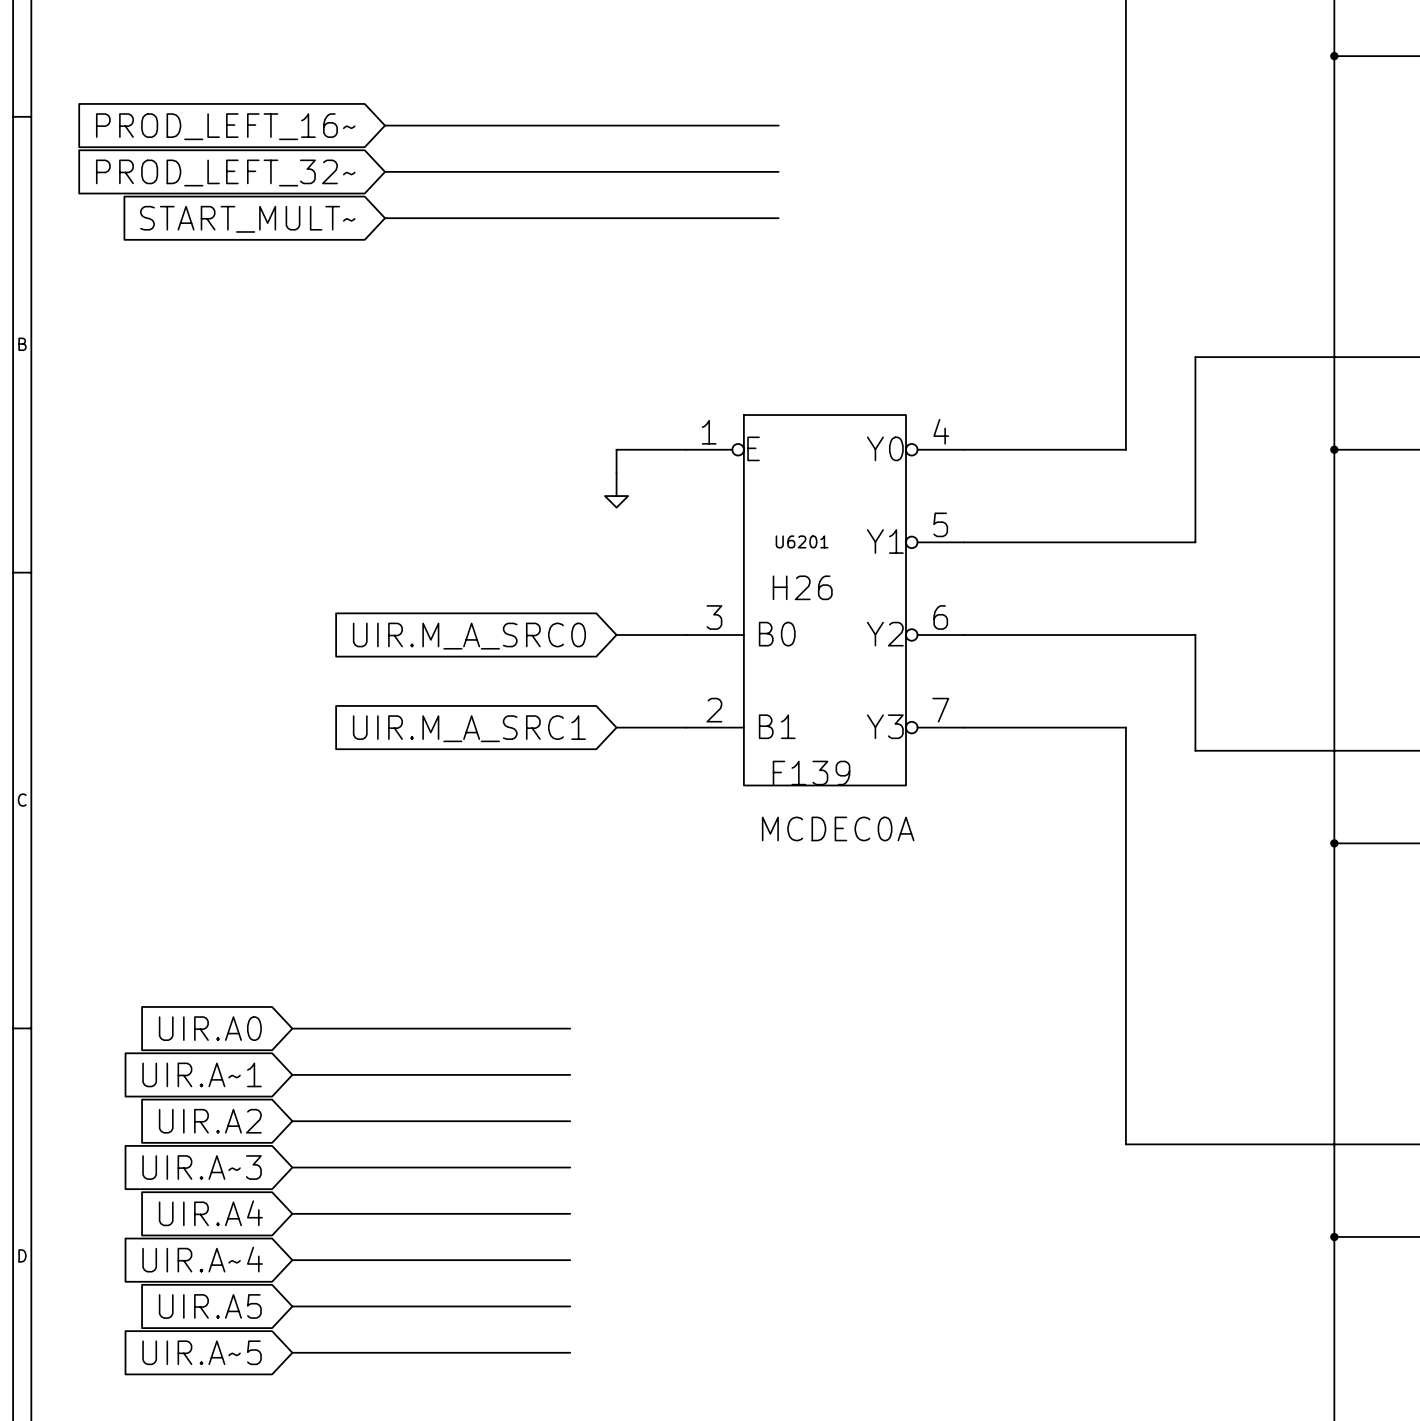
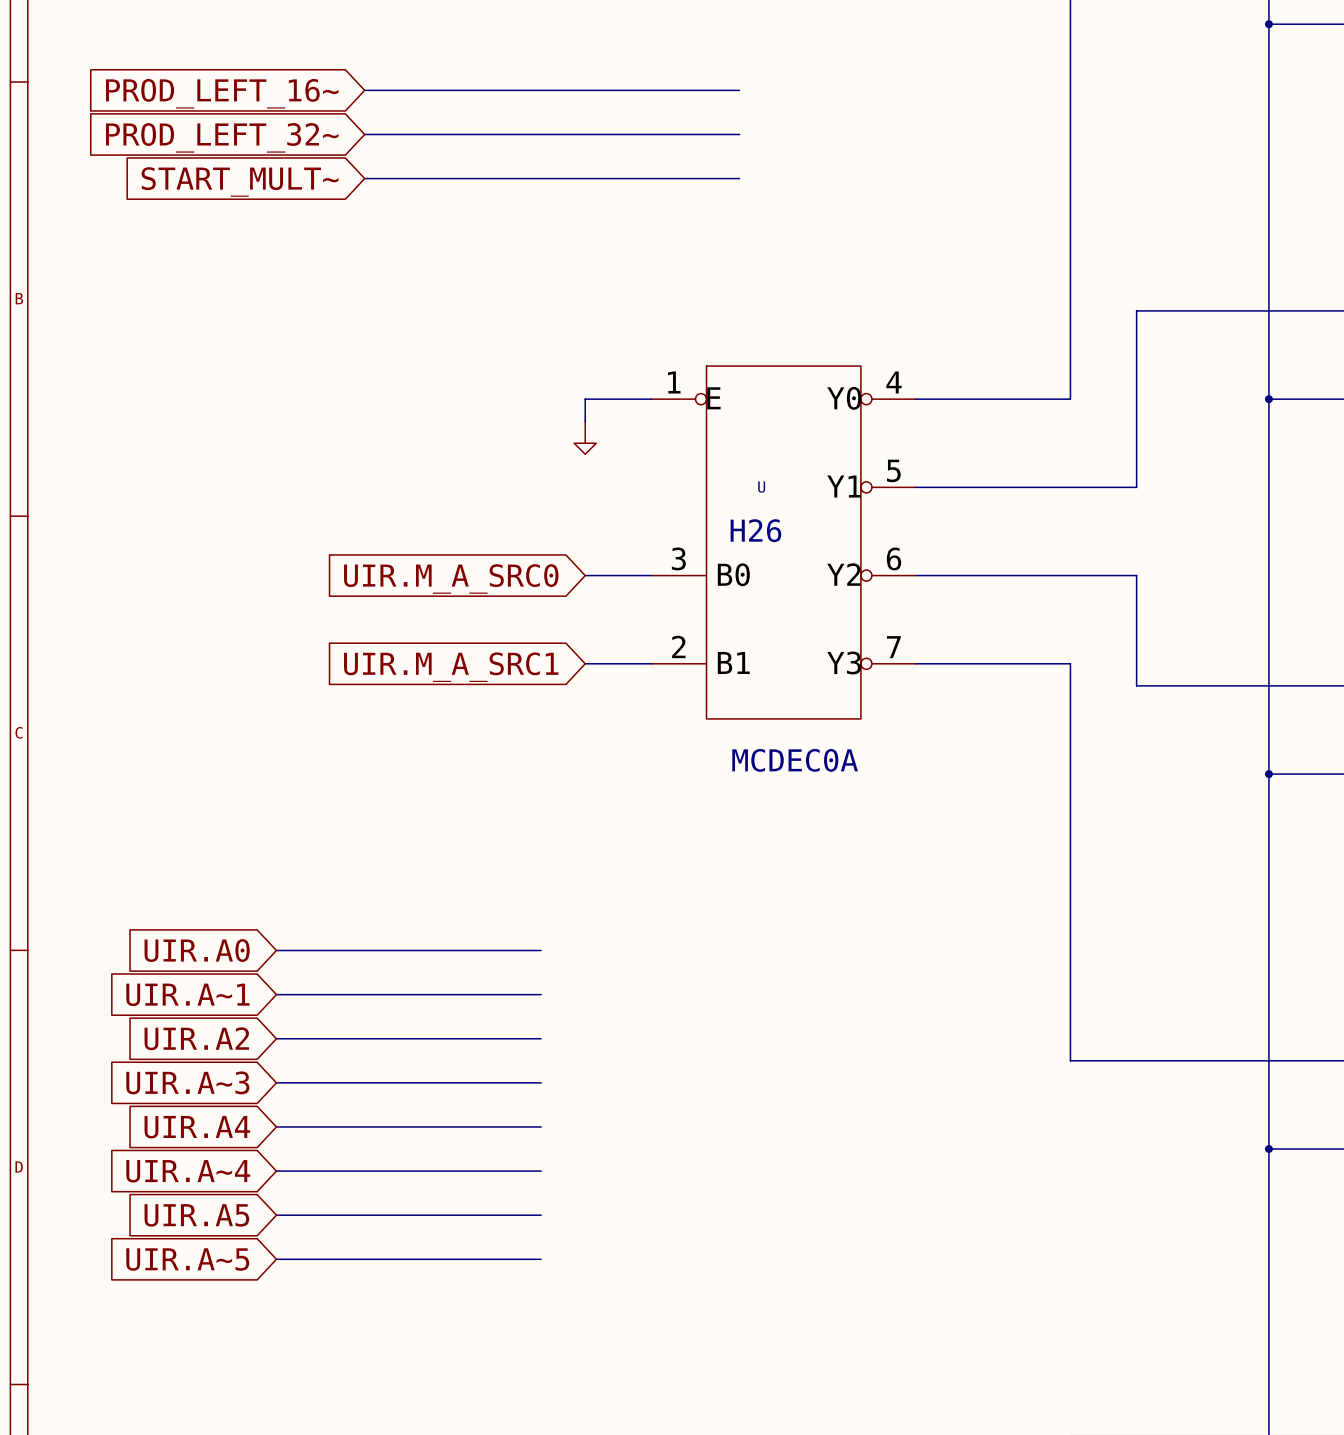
U6201 name: U6201 (802, 541) -> U (761, 487)
U6201 value: F139 (811, 773) -> none

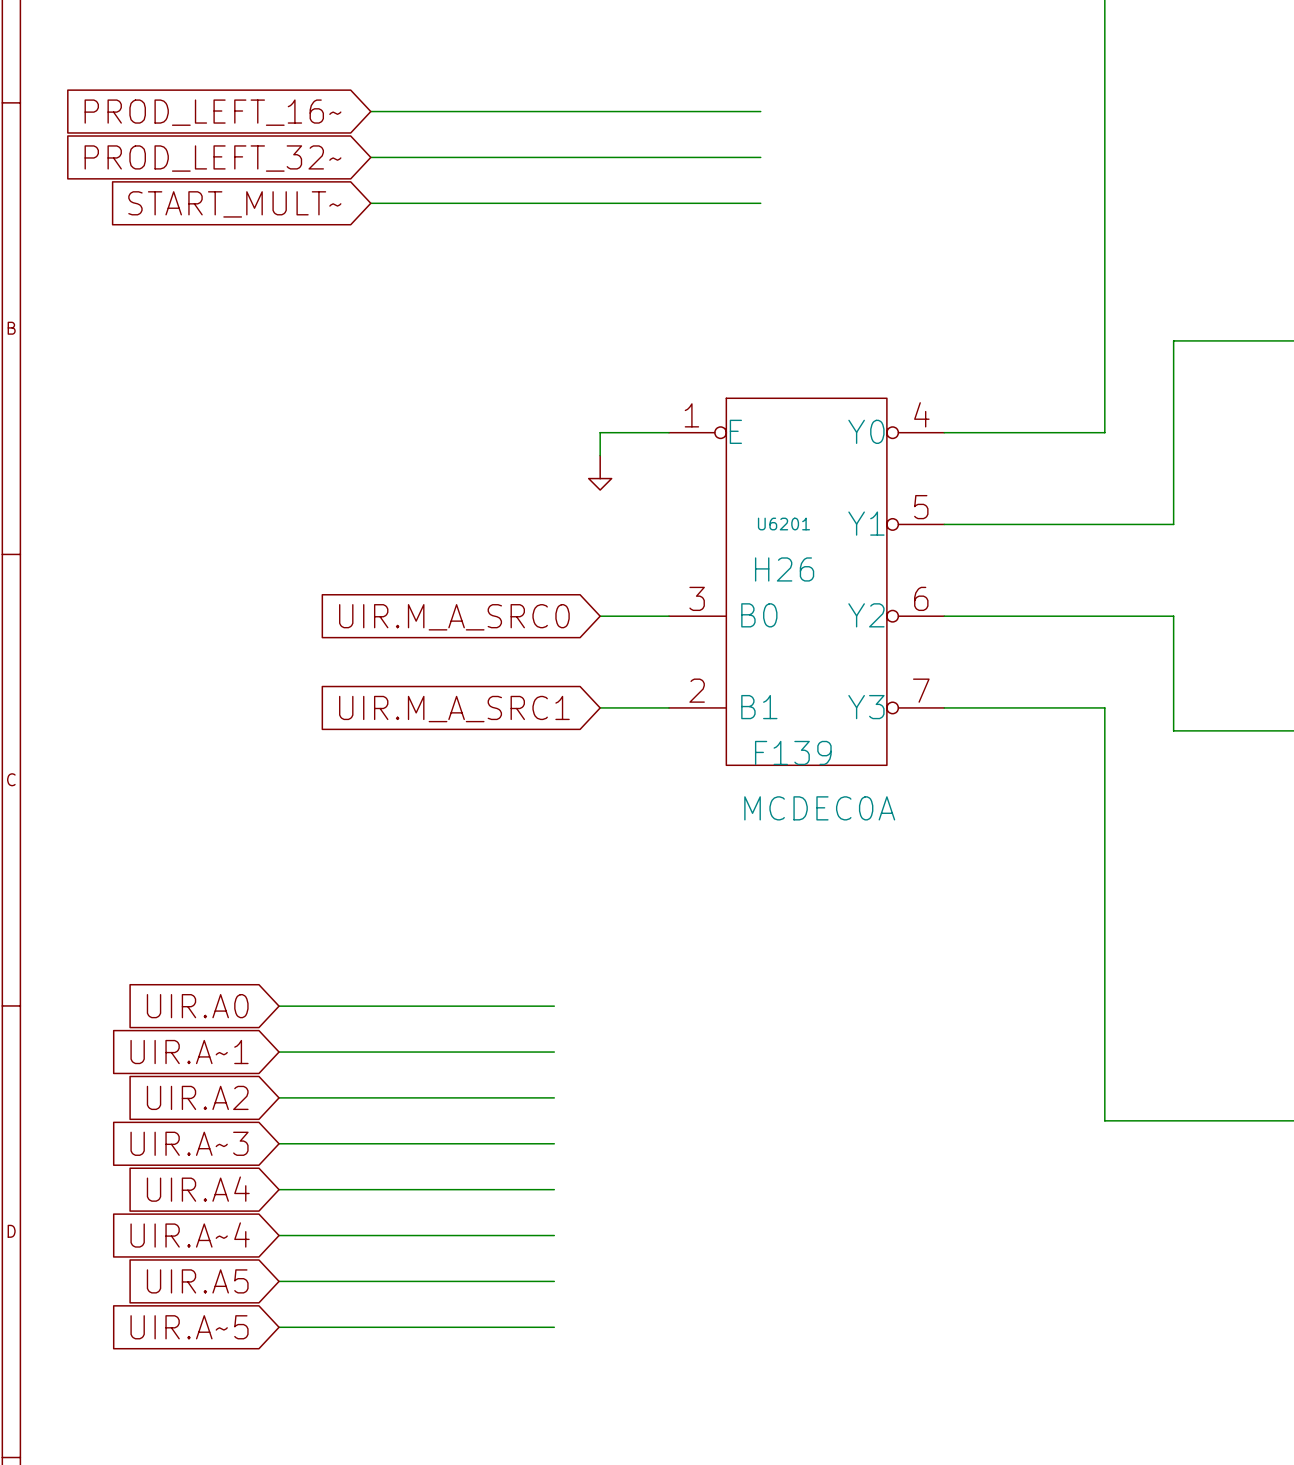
U name: U (761, 487) -> U6201 (783, 524)
U value: none -> F139 (793, 752)

